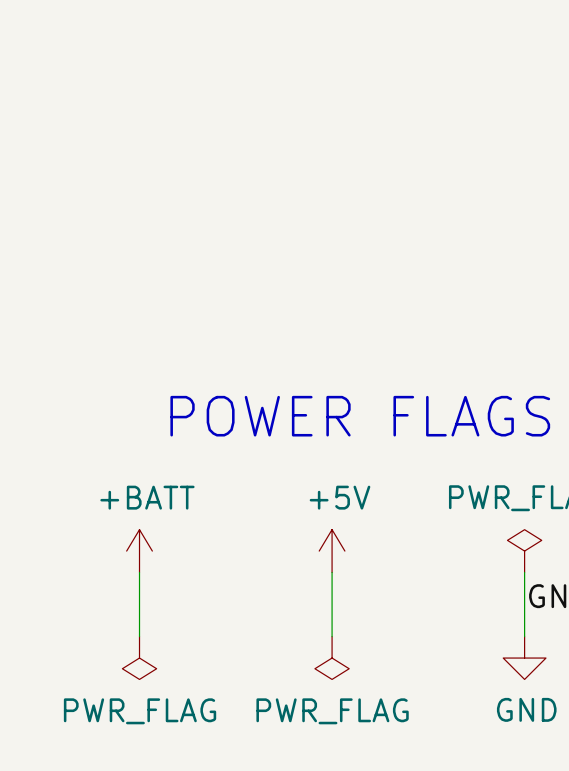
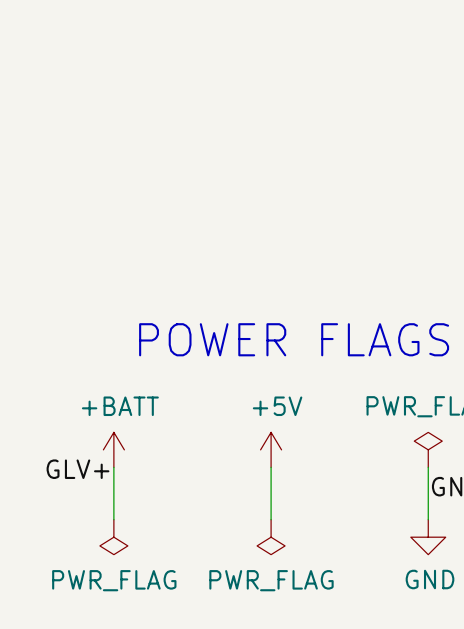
label: none -> GLV+ (78, 469)

